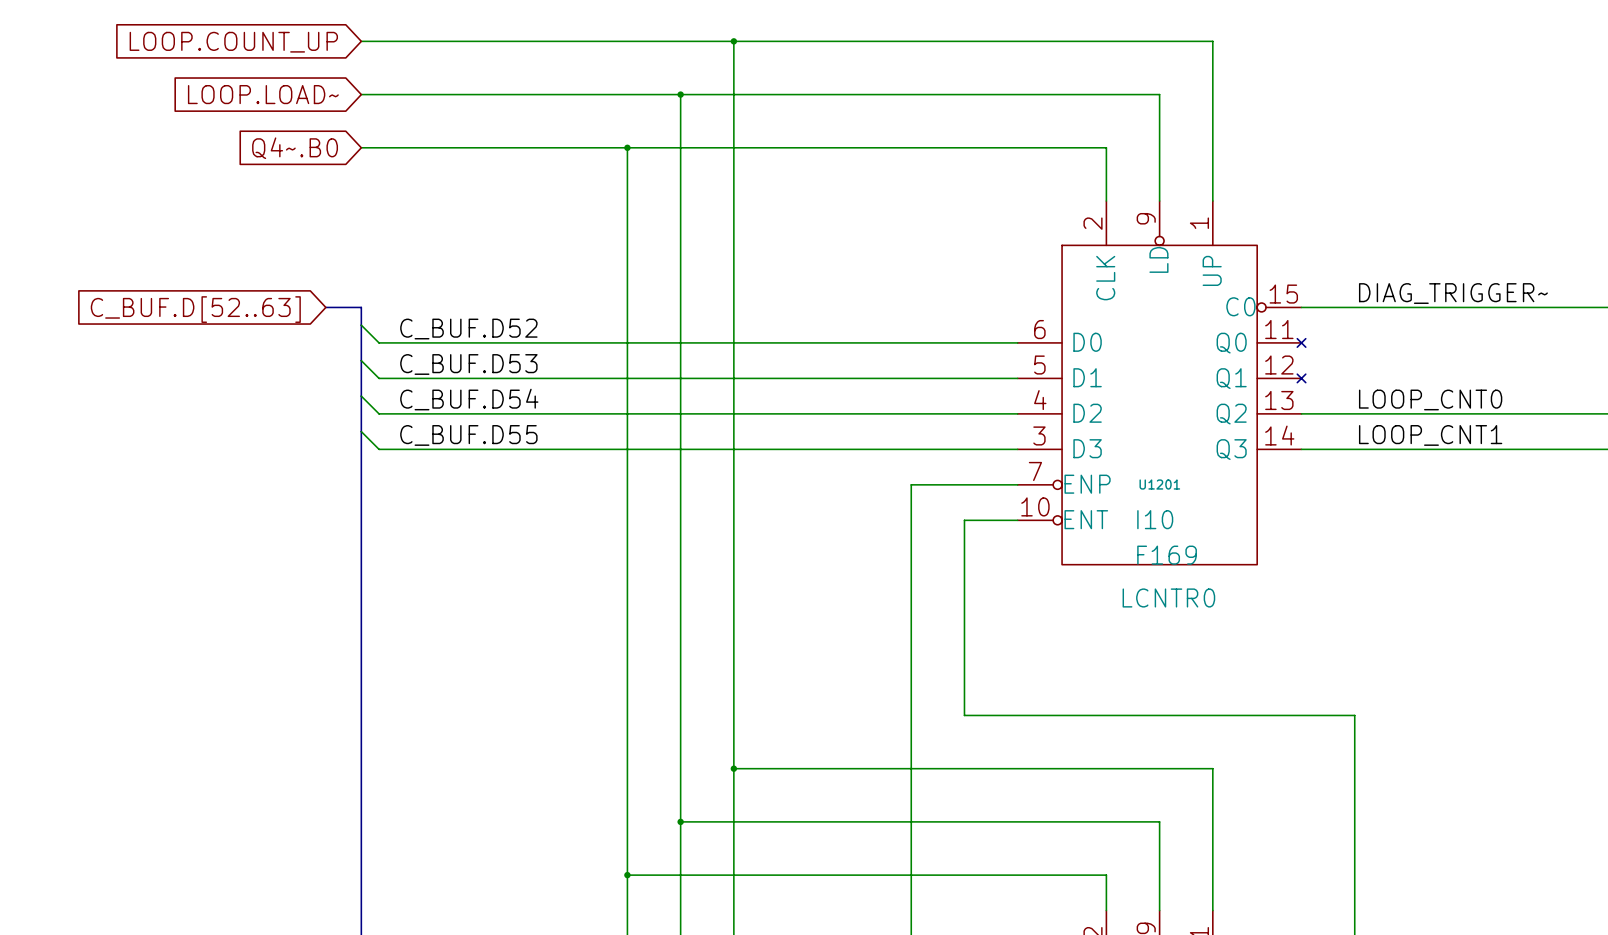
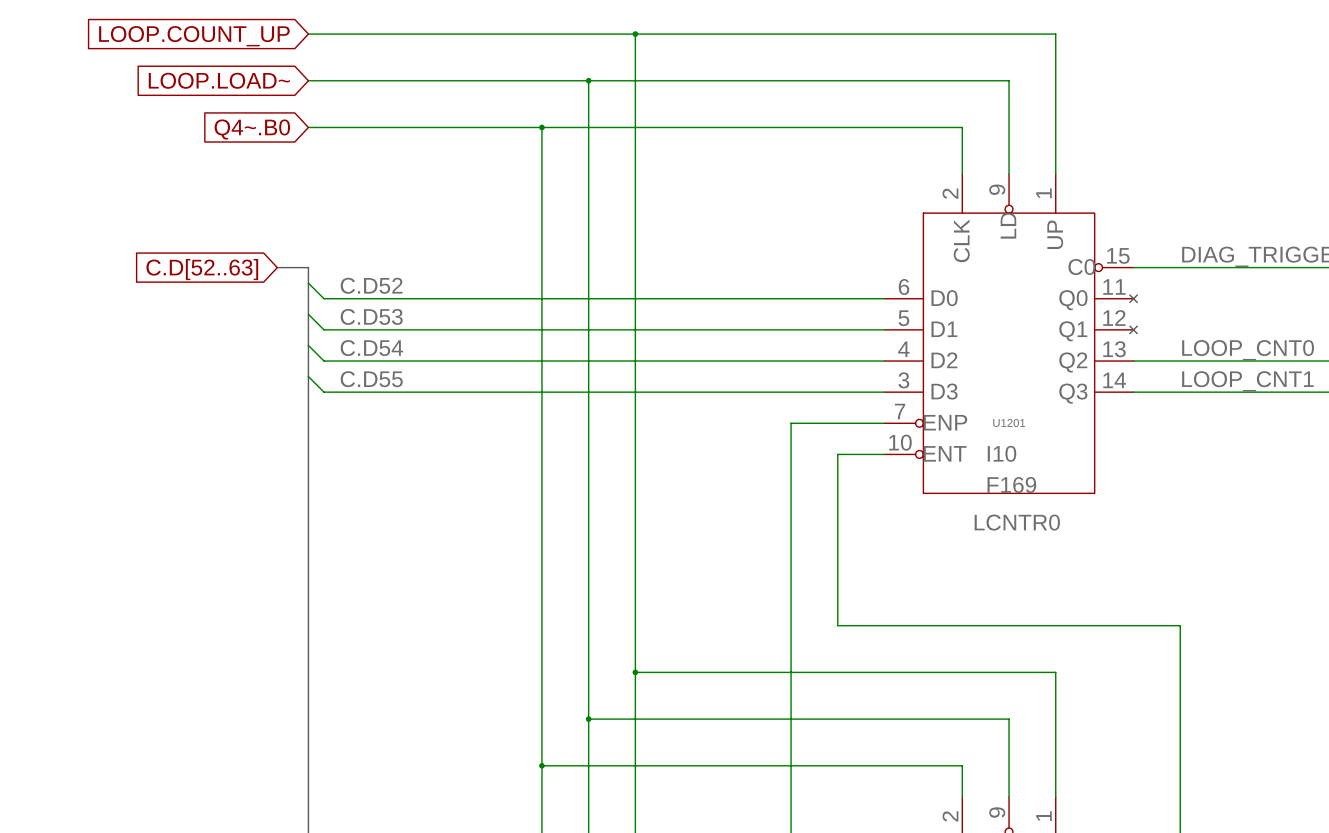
global label: C_BUF.D[52..63] (195, 309) -> C.D[52..63] (202, 269)
label: C_BUF.D52 (468, 329) -> C.D52 (371, 285)
label: C_BUF.D53 (468, 364) -> C.D53 (371, 316)
label: C_BUF.D54 (469, 399) -> C.D54 (371, 348)
label: C_BUF.D55 (468, 435) -> C.D55 (371, 379)

